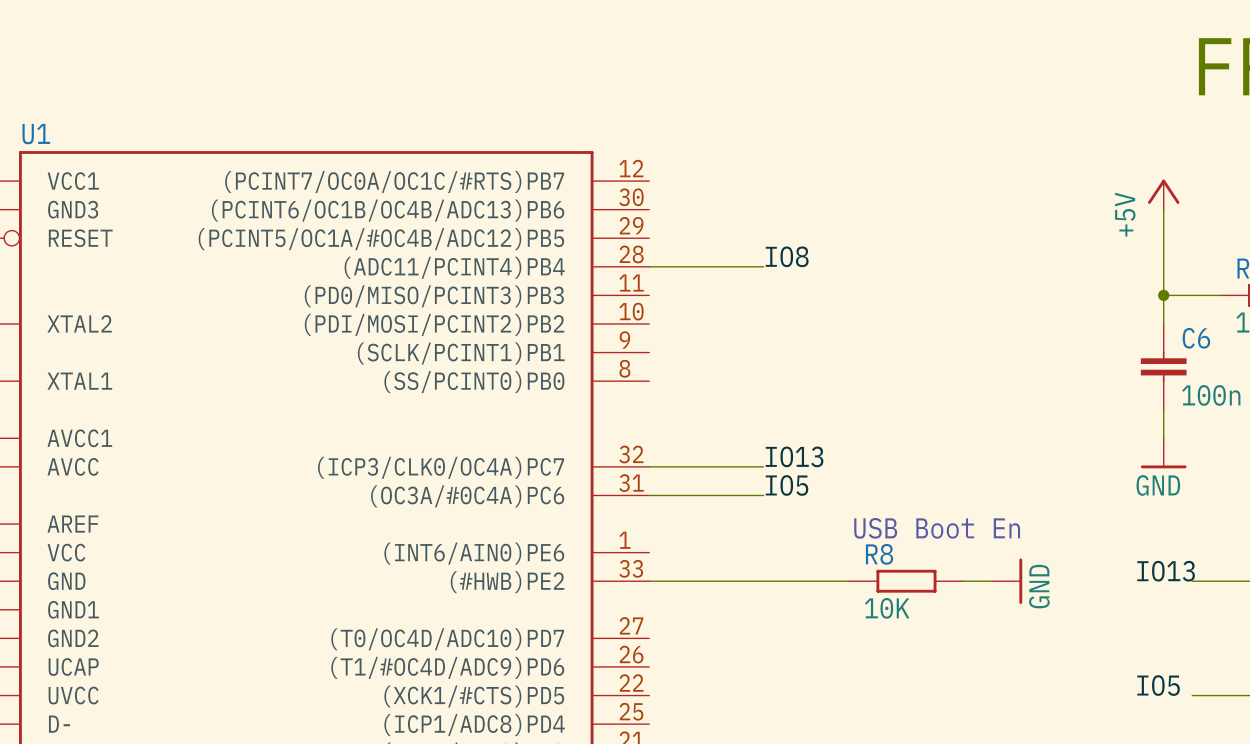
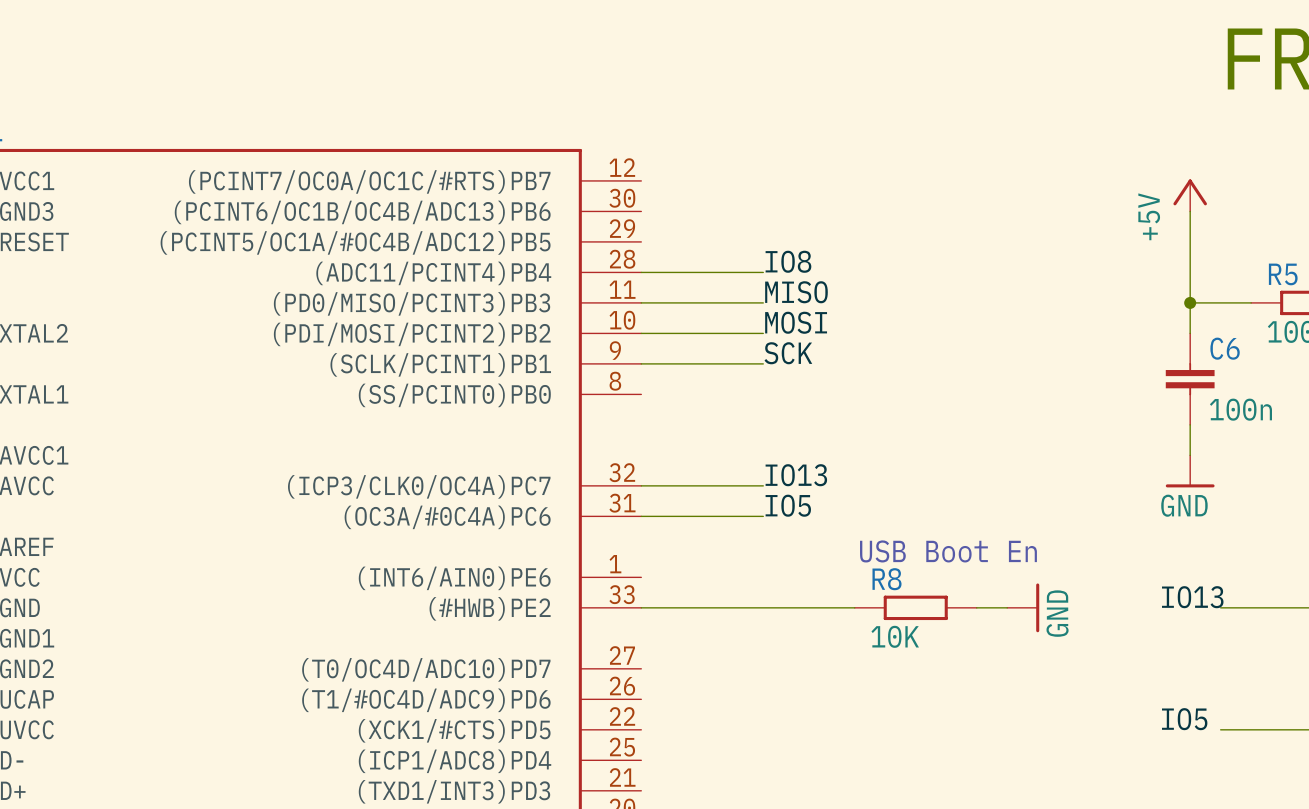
label: none -> MISO (796, 292)
wire: none -> (641, 302) (763, 302)
label: none -> MOSI (796, 322)
wire: none -> (641, 333) (763, 333)
label: none -> SCK (788, 353)
wire: none -> (641, 363) (763, 363)

